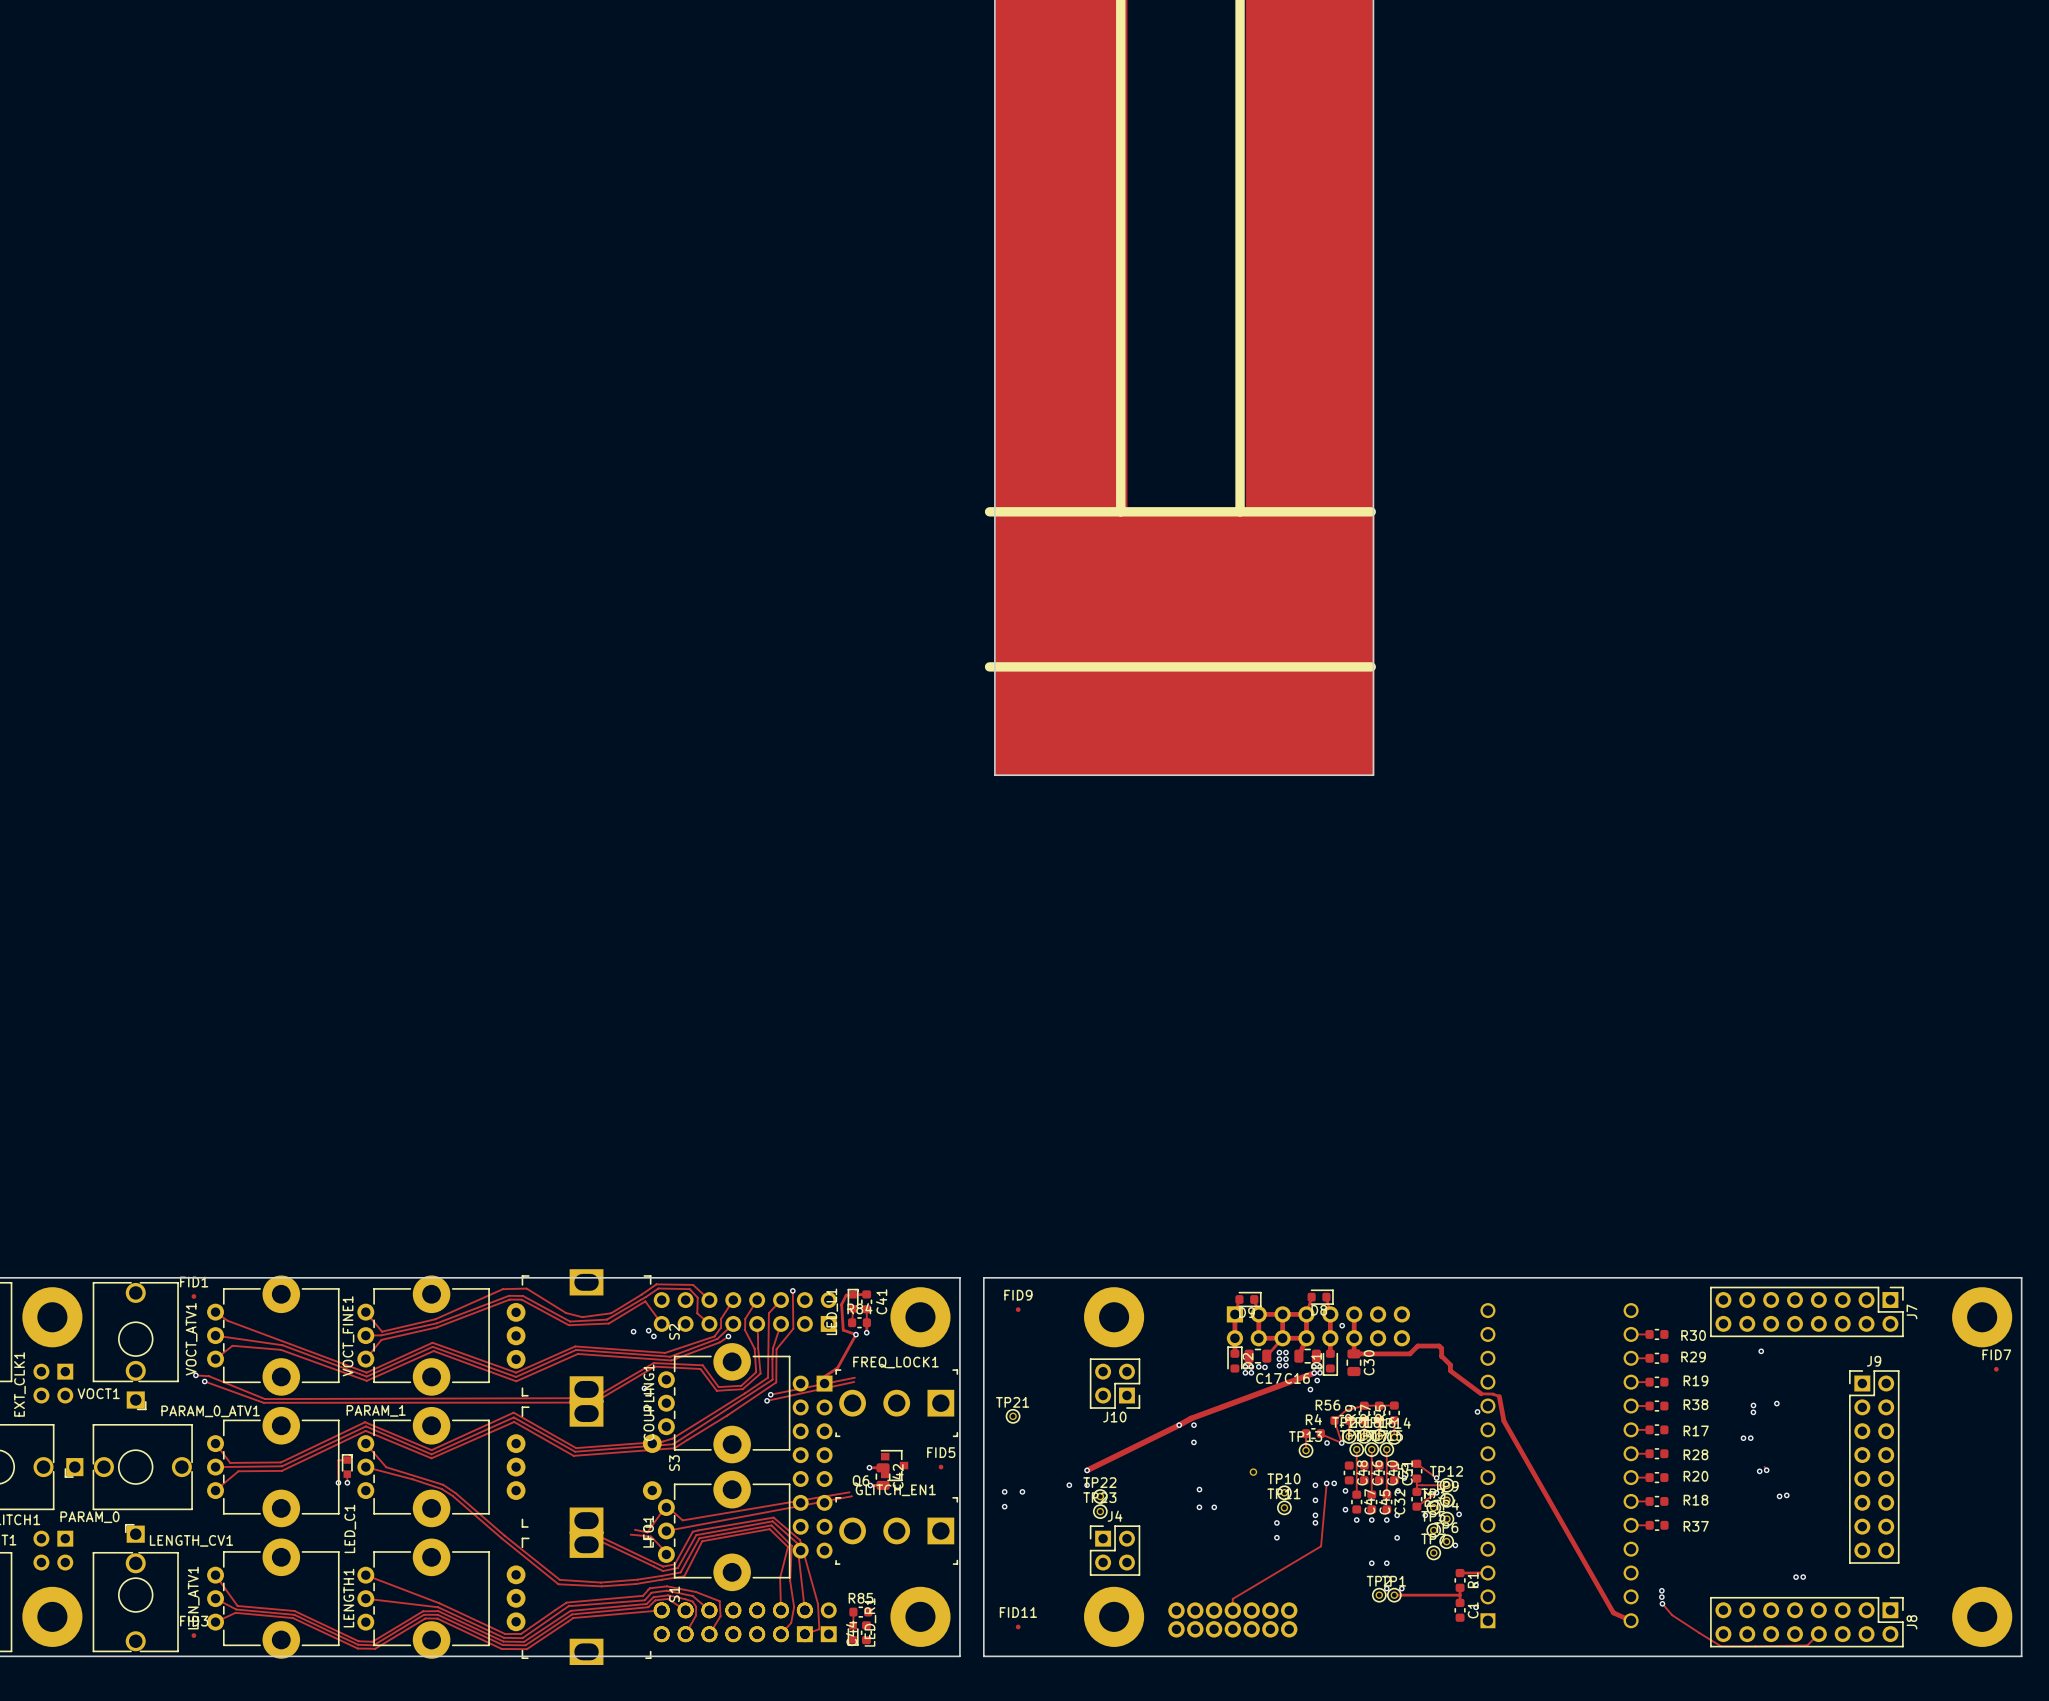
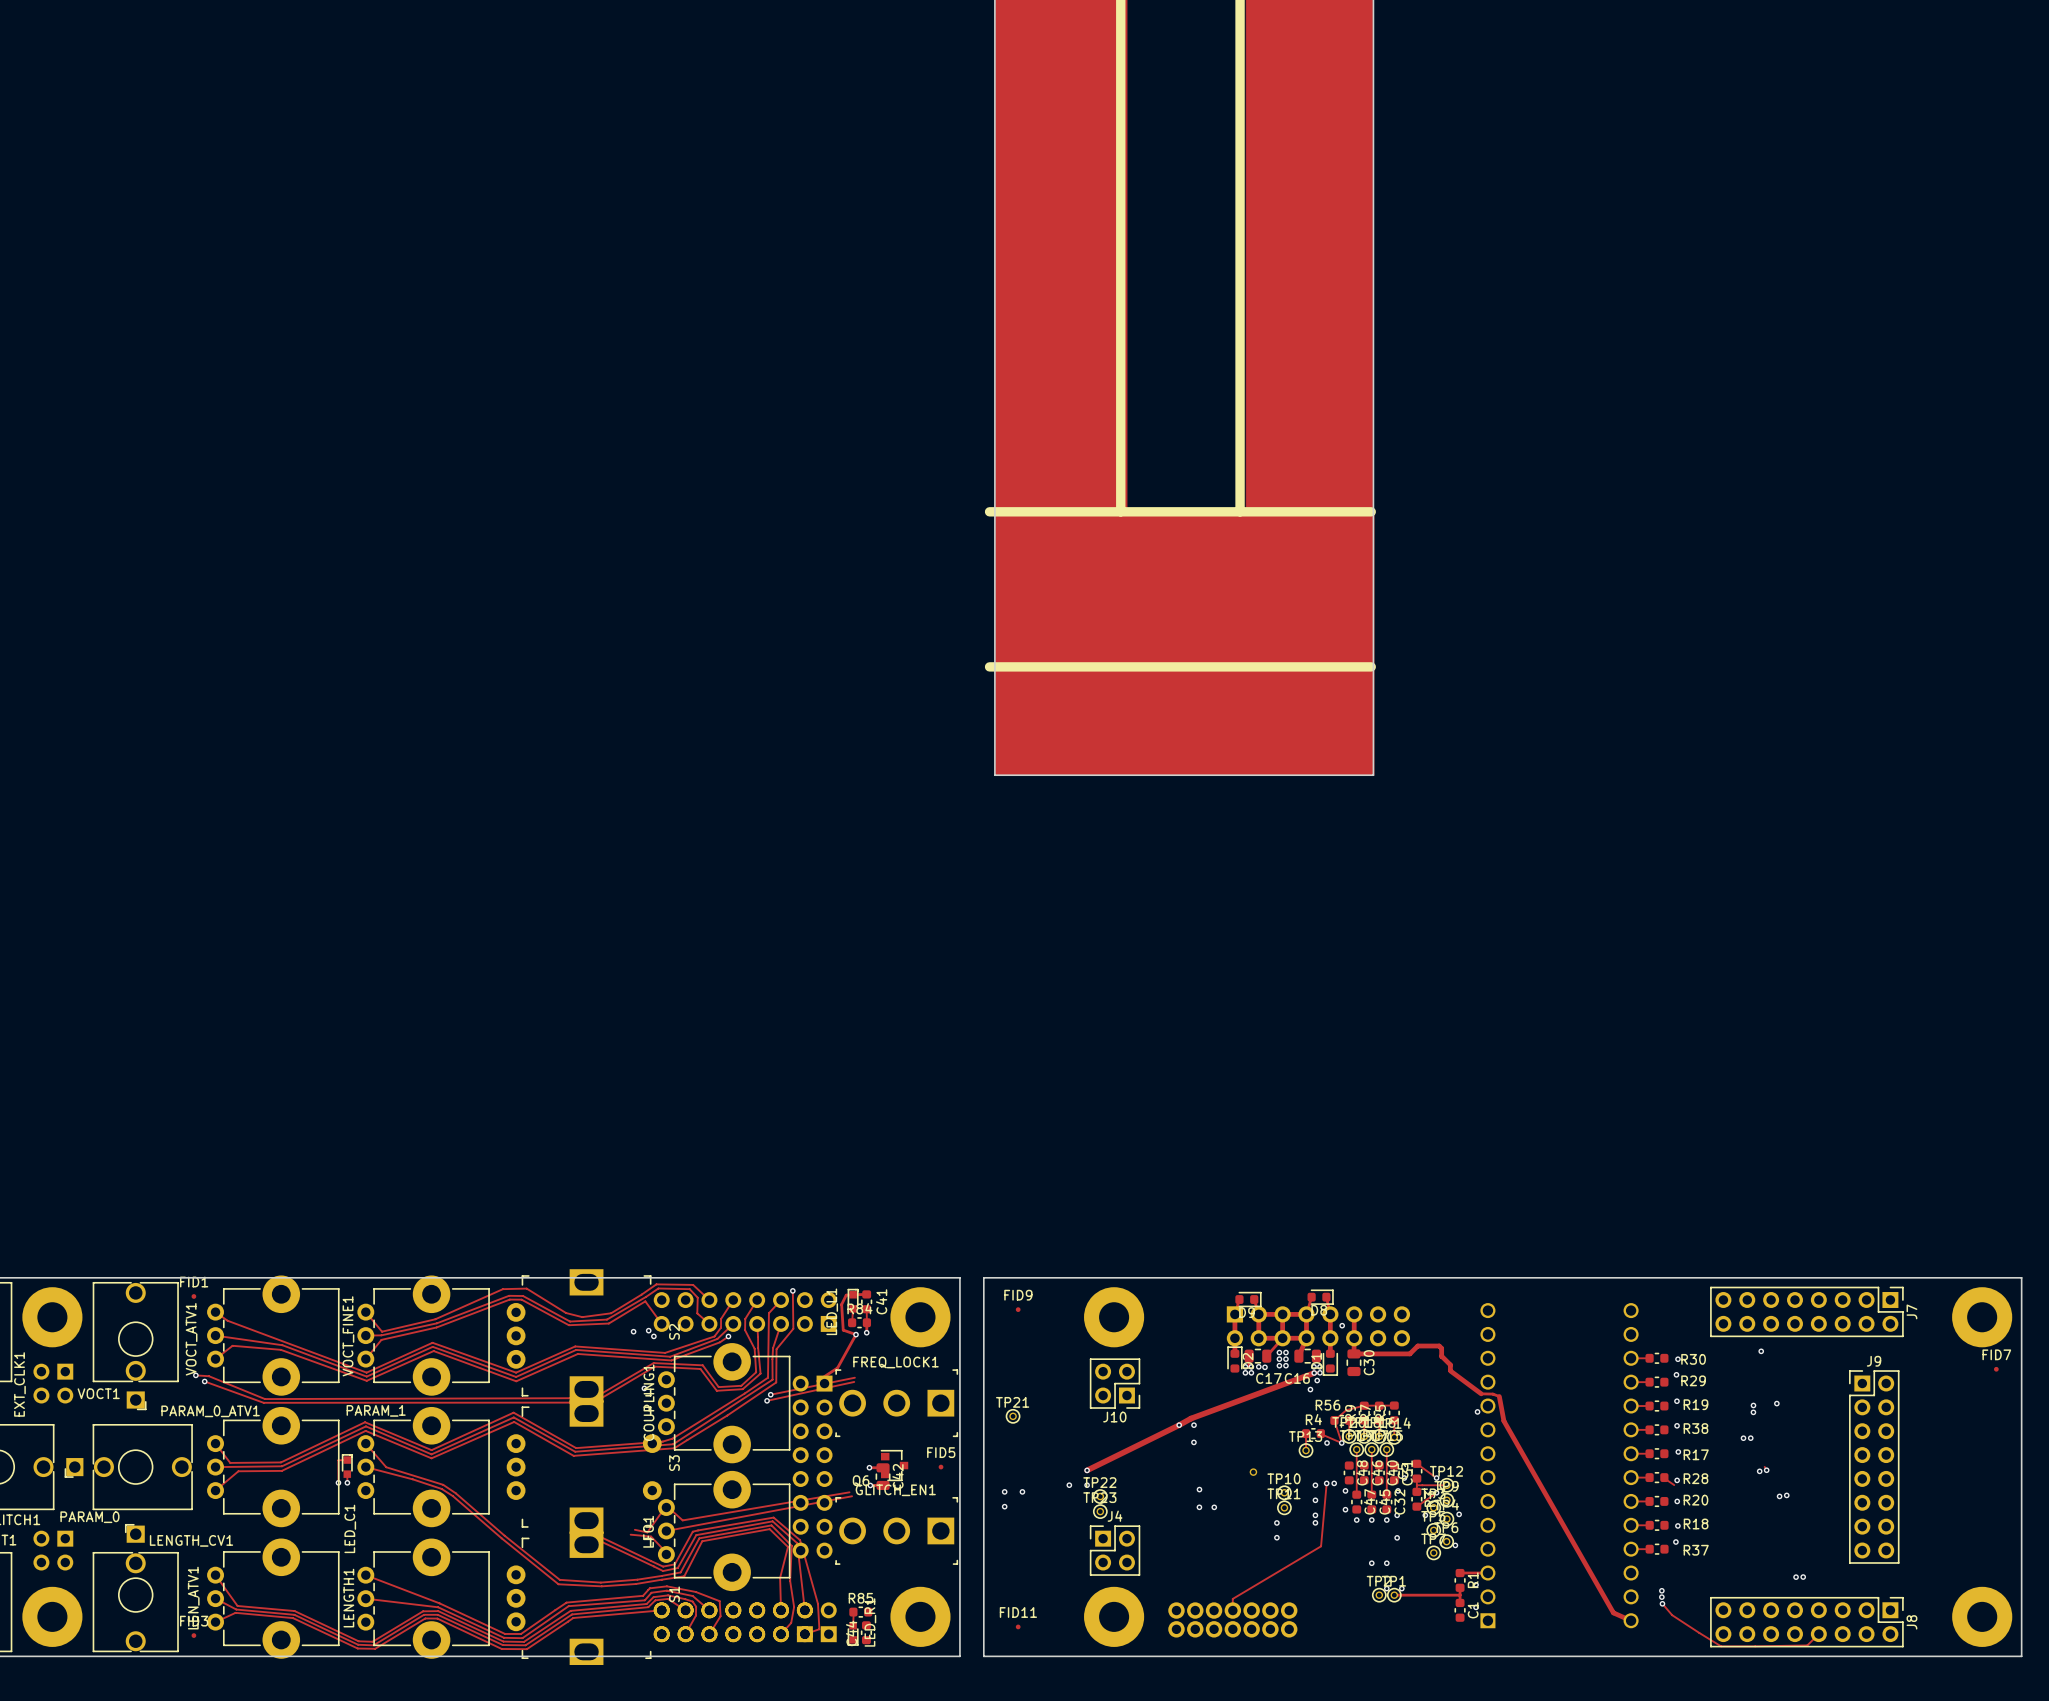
track: (1631, 1334) (1649, 1334) -> (1631, 1549) (1649, 1549)
R30: (1656, 1334) -> none
R29 name: R29 (1693, 1356) -> R30 (1693, 1359)
via: none -> (1677, 1359)
via: none -> (1676, 1374)
R19 name: R19 (1695, 1380) -> R29 (1693, 1380)
via: none -> (1676, 1401)
R38 name: R38 (1695, 1404) -> R19 (1695, 1404)
via: none -> (1677, 1425)
R17 name: R17 (1696, 1430) -> R38 (1695, 1428)
via: none -> (1678, 1451)
R28 name: R28 (1695, 1454) -> R17 (1696, 1454)
R20 name: R20 (1695, 1476) -> R28 (1695, 1478)
track: none -> (1664, 1478) (1674, 1485)
via: none -> (1677, 1480)
R18 name: R18 (1695, 1500) -> R20 (1695, 1500)
via: none -> (1677, 1501)
via: none -> (1677, 1525)
R37 name: R37 (1696, 1526) -> R18 (1696, 1524)
via: none -> (1675, 1542)
R37: none -> (1657, 1549)

